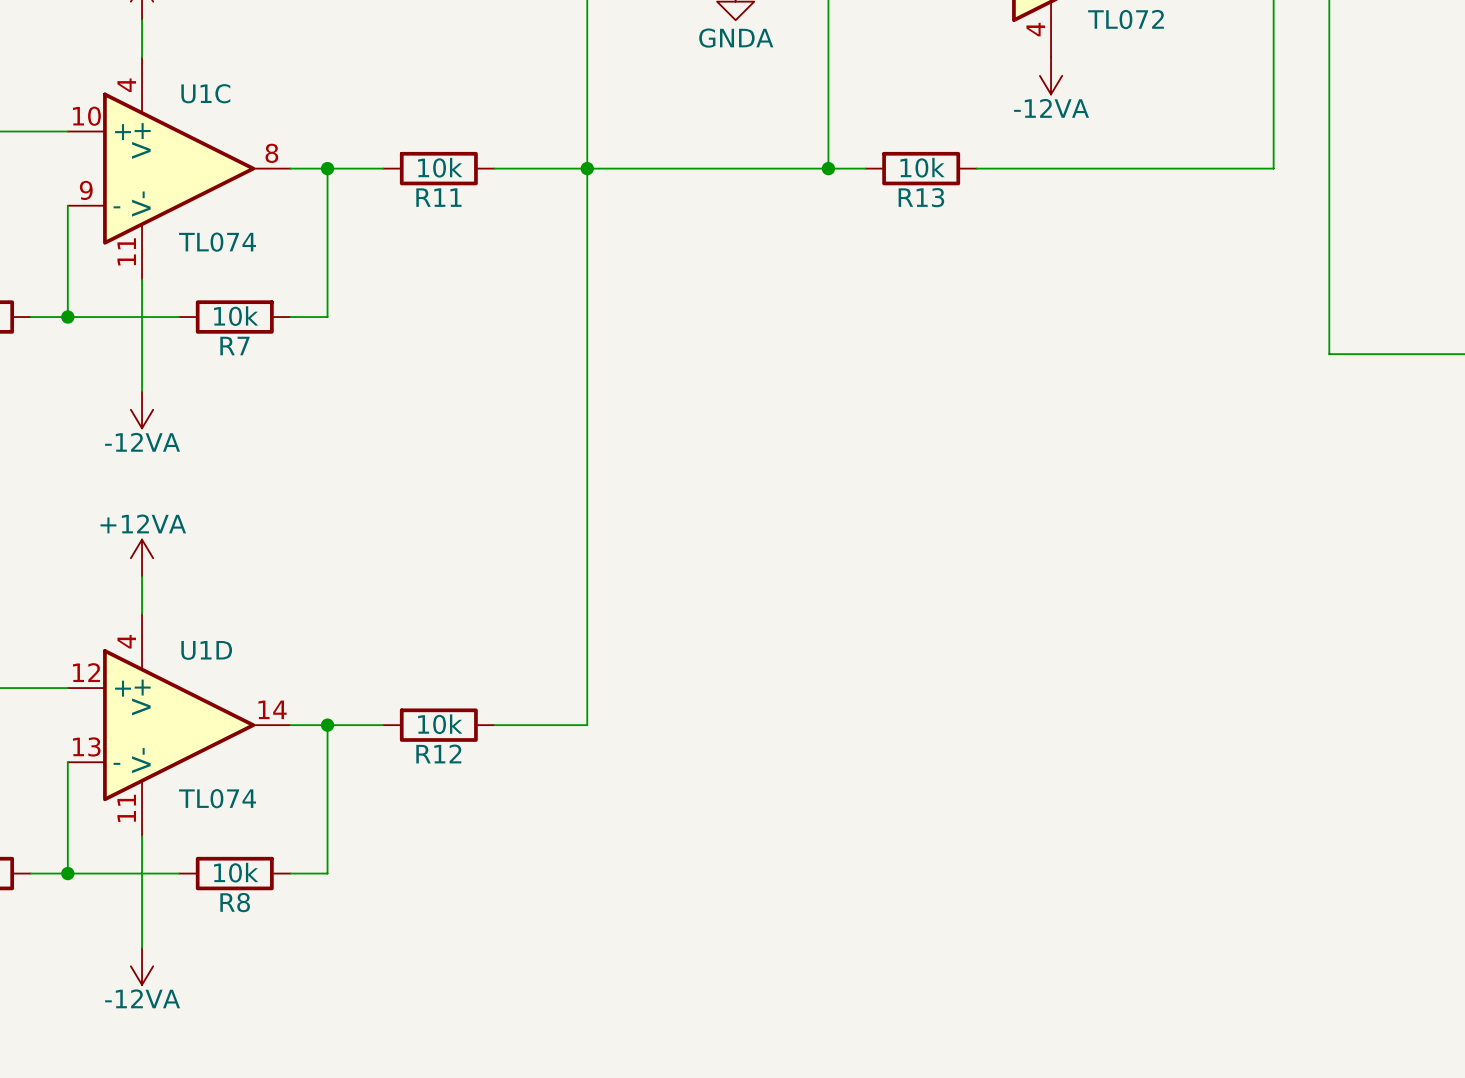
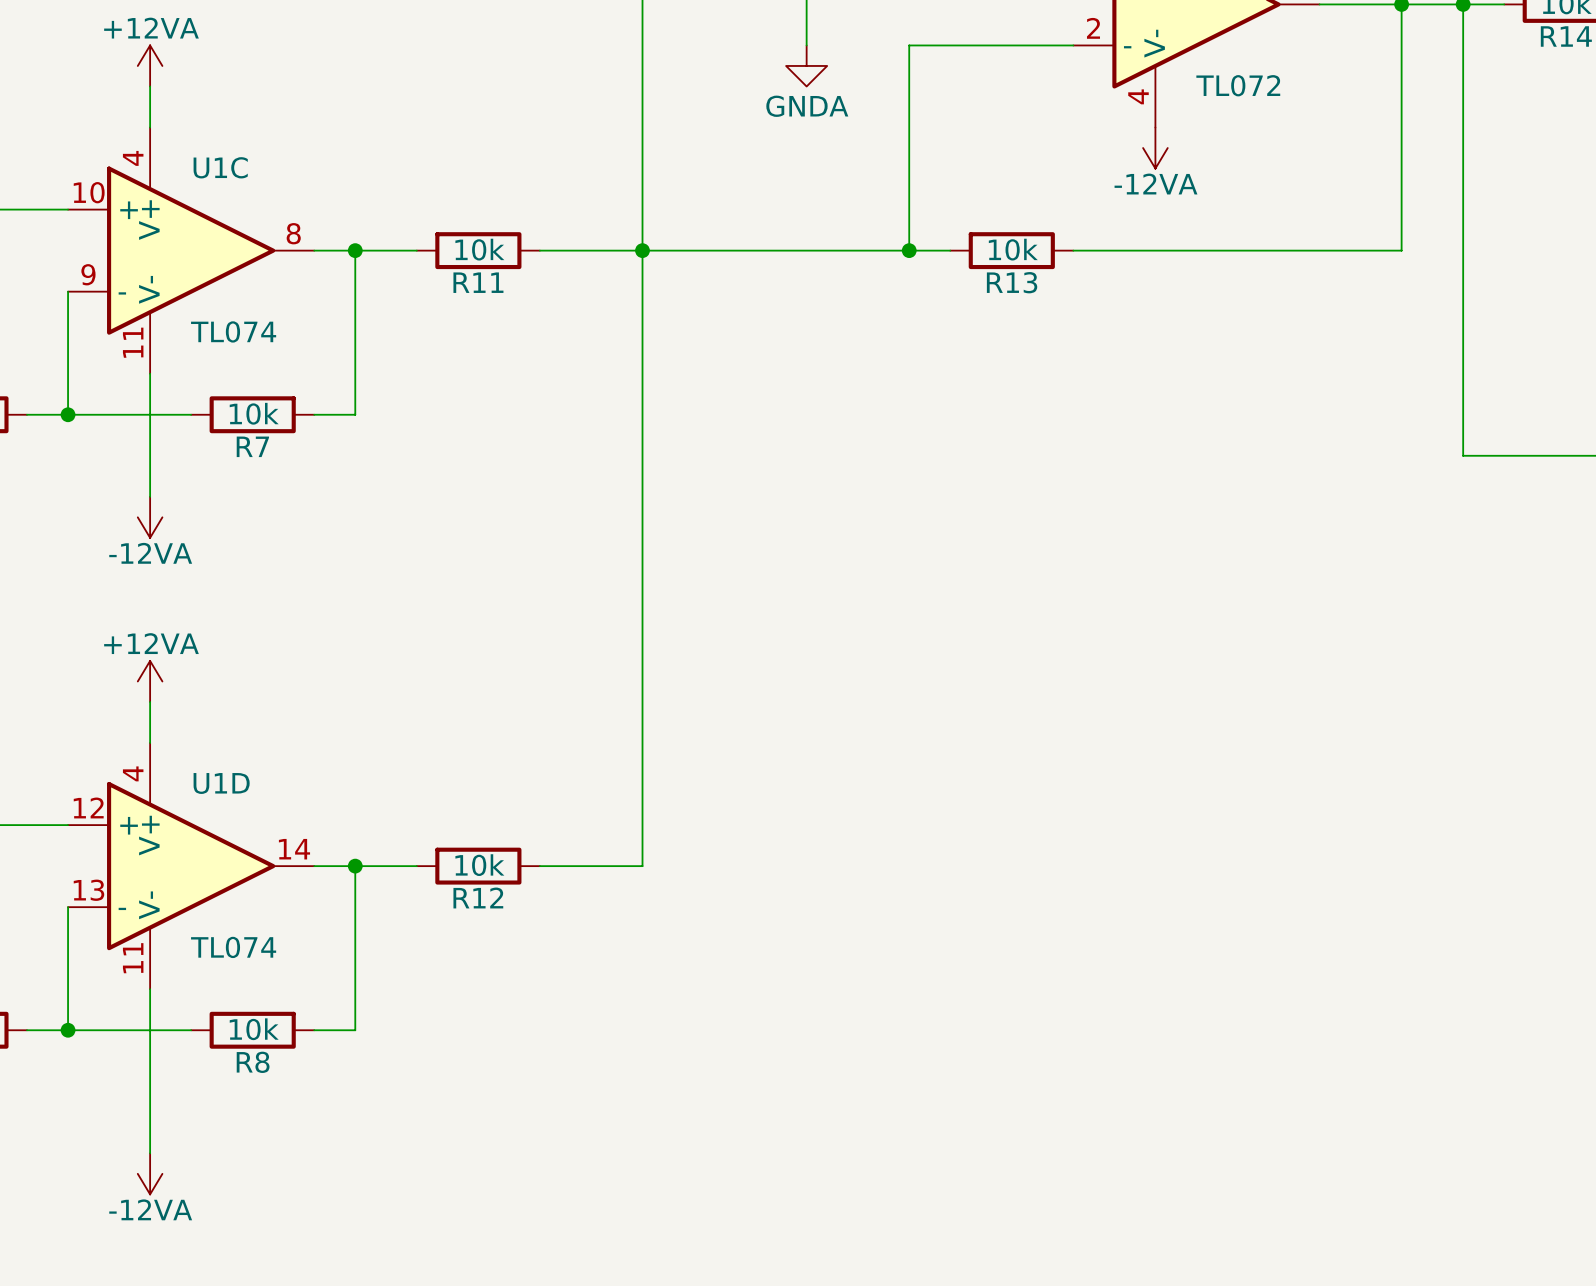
power symbol position: -12VA (142, 966) -> -12VA (150, 1173)

